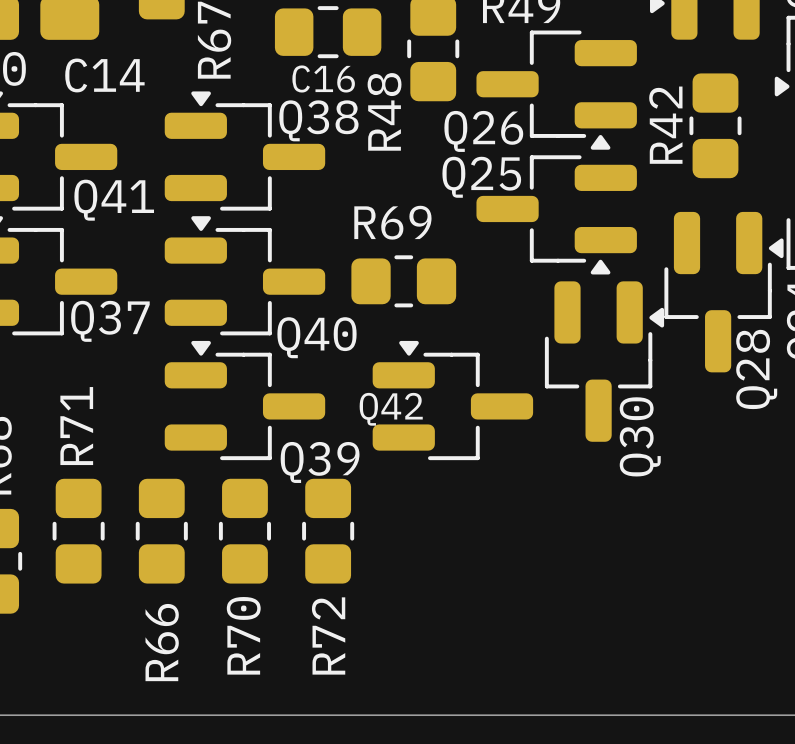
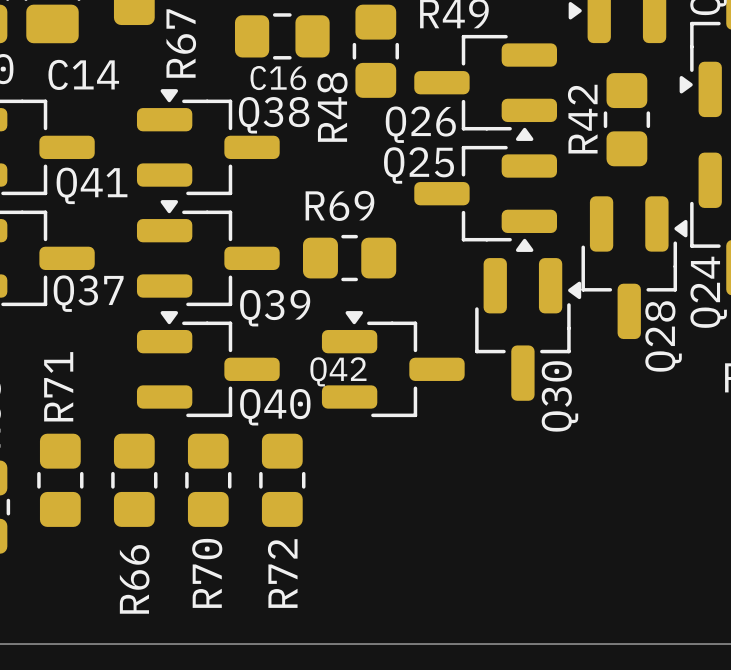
Q40 name: Q40 (317, 337) -> Q39 (275, 308)
Q39 name: Q39 (320, 462) -> Q40 (275, 407)

